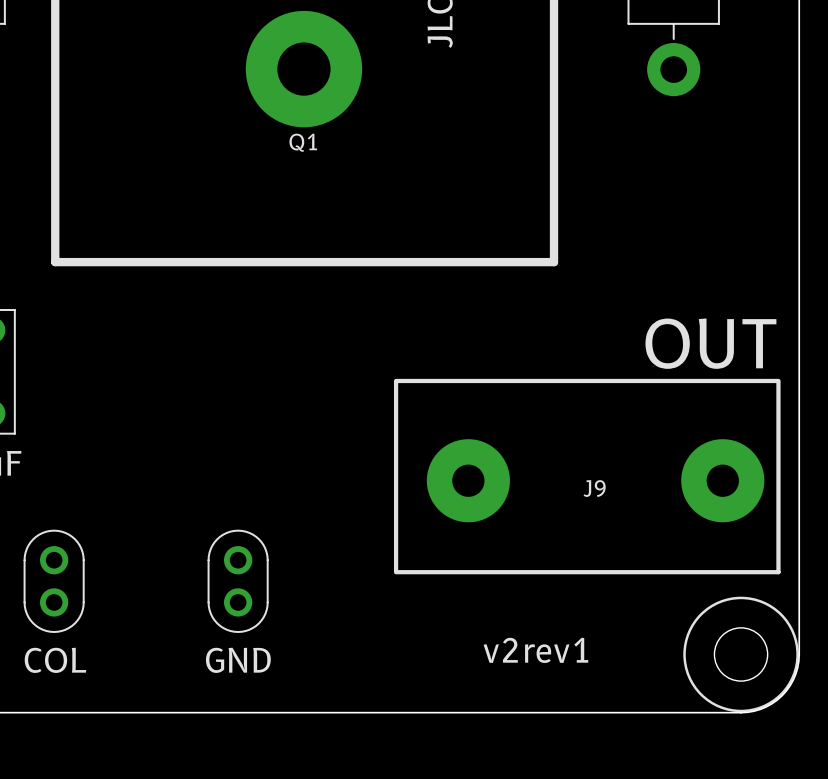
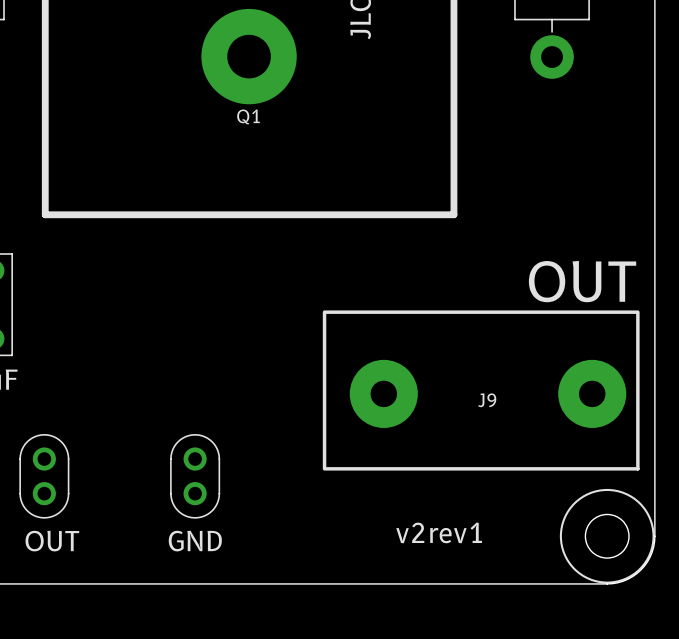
text: COL (55, 660) -> OUT (52, 541)

